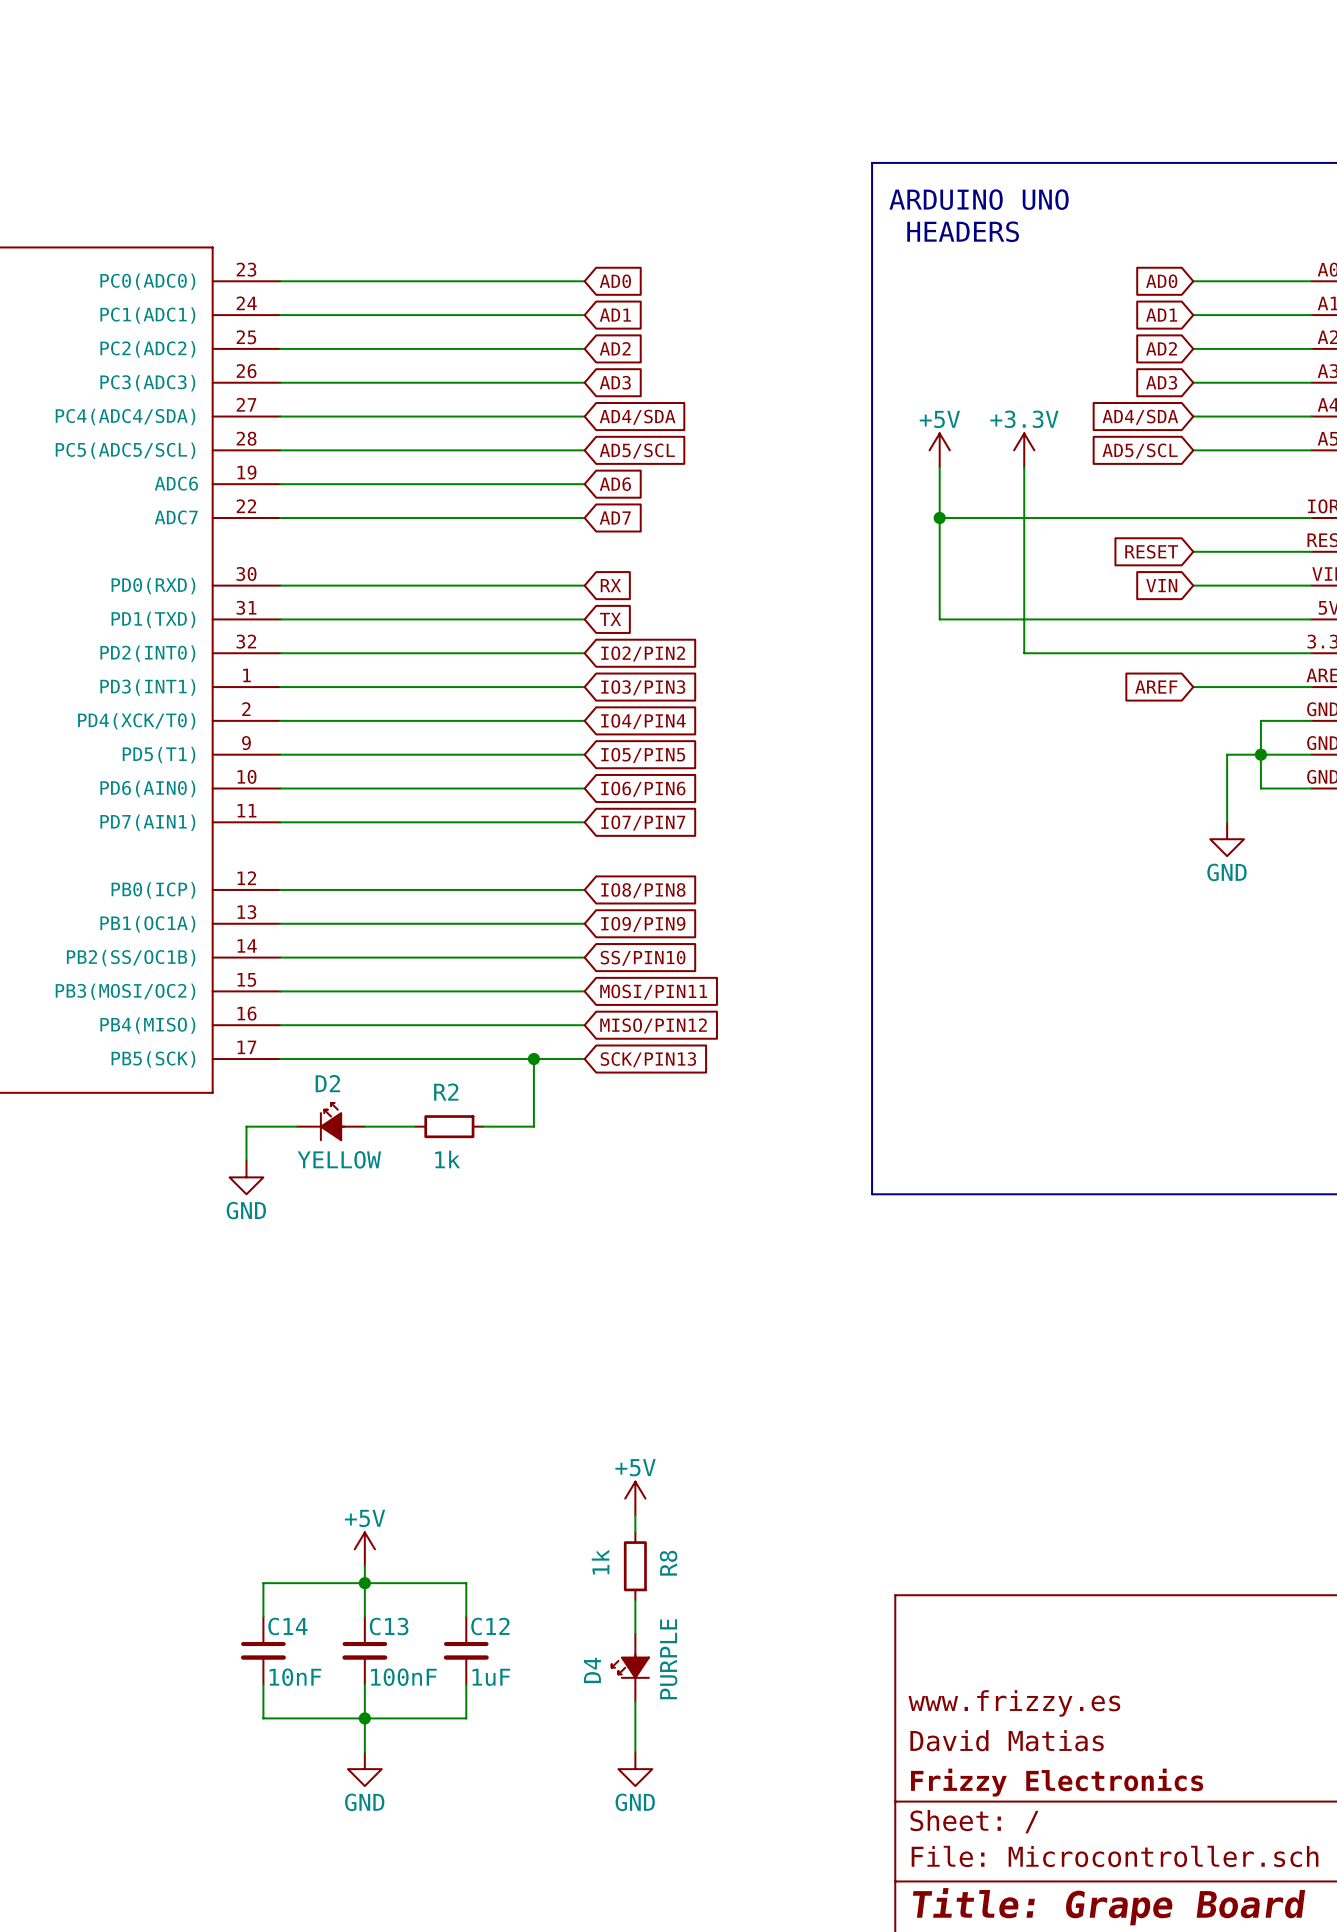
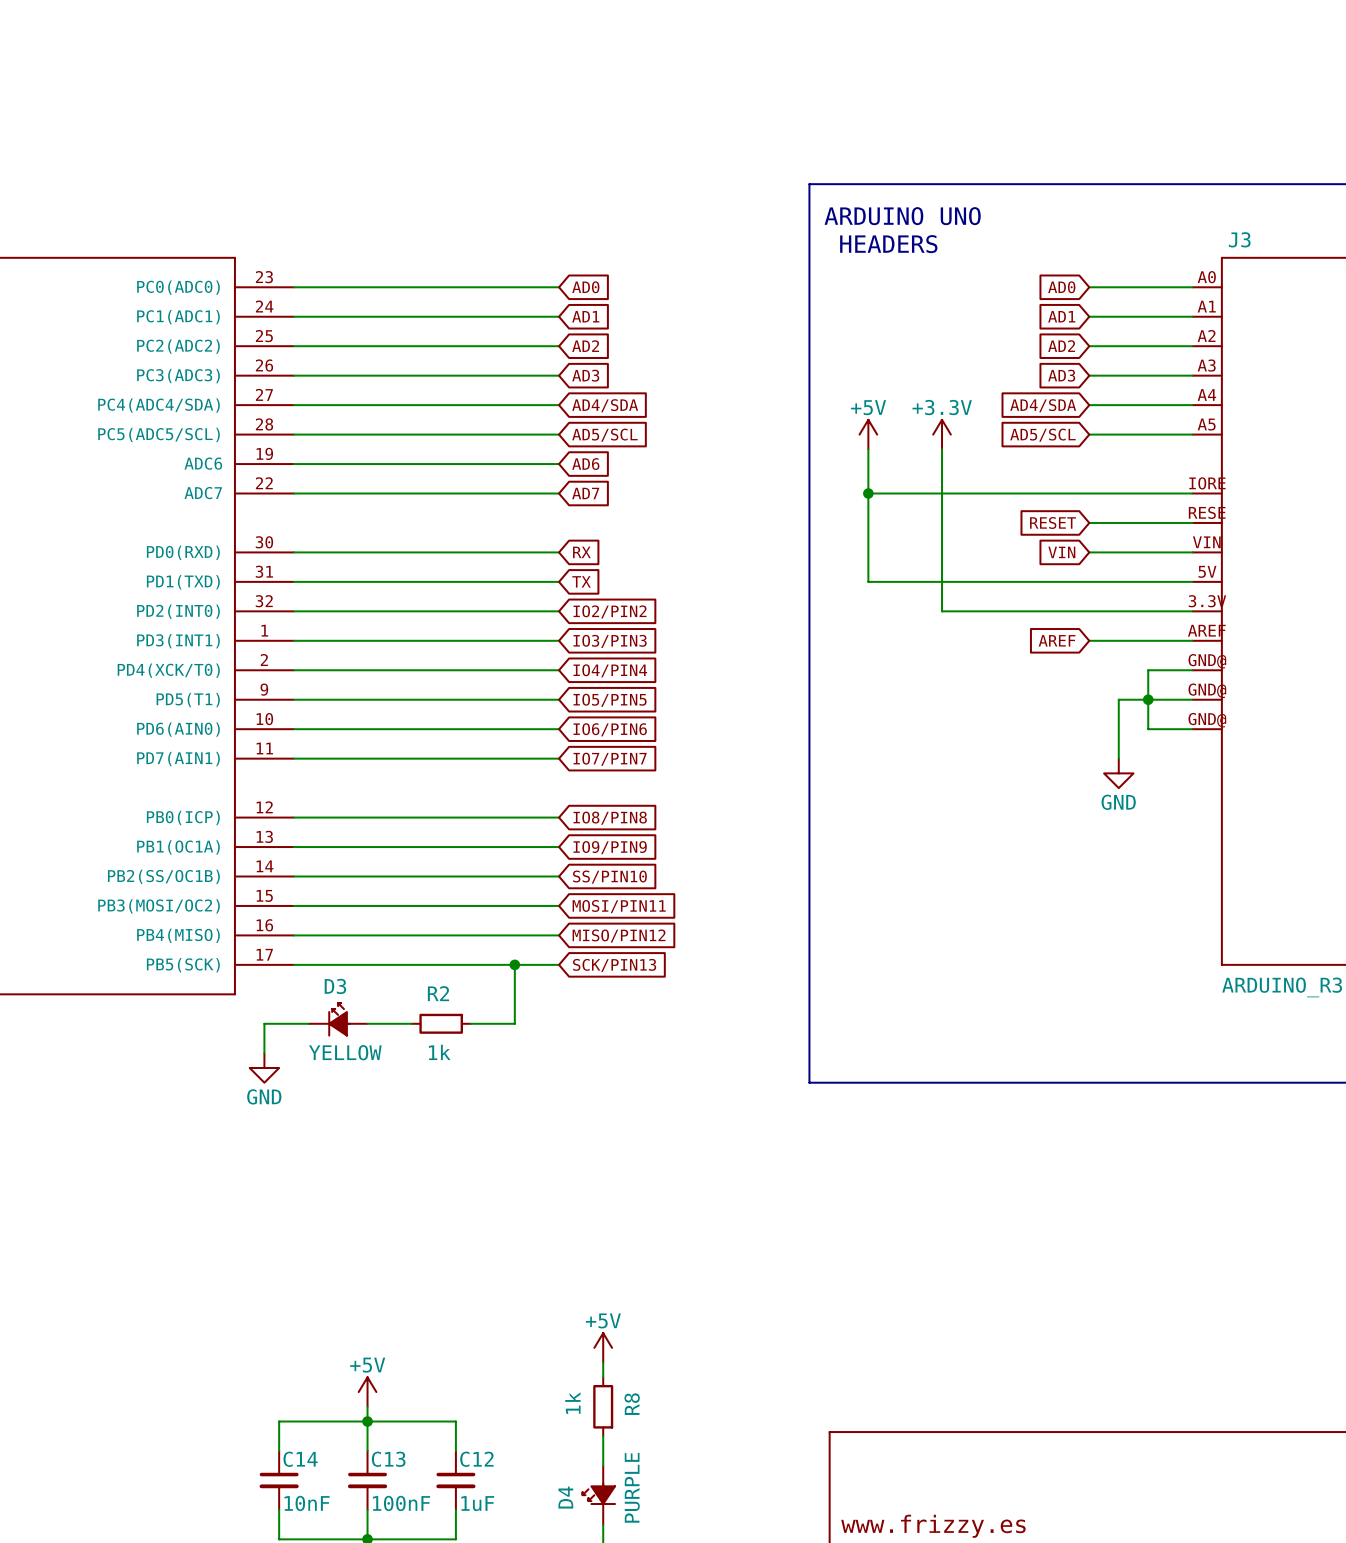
D2 name: D2 (327, 1083) -> D3 (335, 986)

